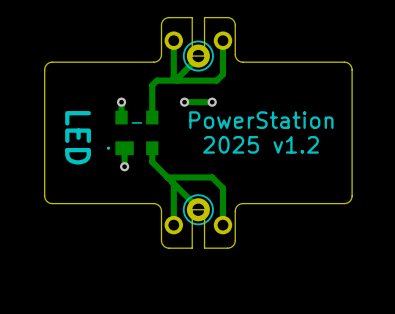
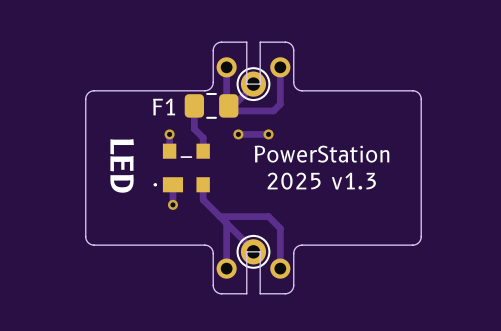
F1: none -> (211, 105)
track: (177, 80) (156, 80) (152, 85) (152, 105) -> (194, 107) (194, 128) (203, 137)
text: 2025 v1.2 (261, 144) -> 2025 v1.3 (321, 181)

